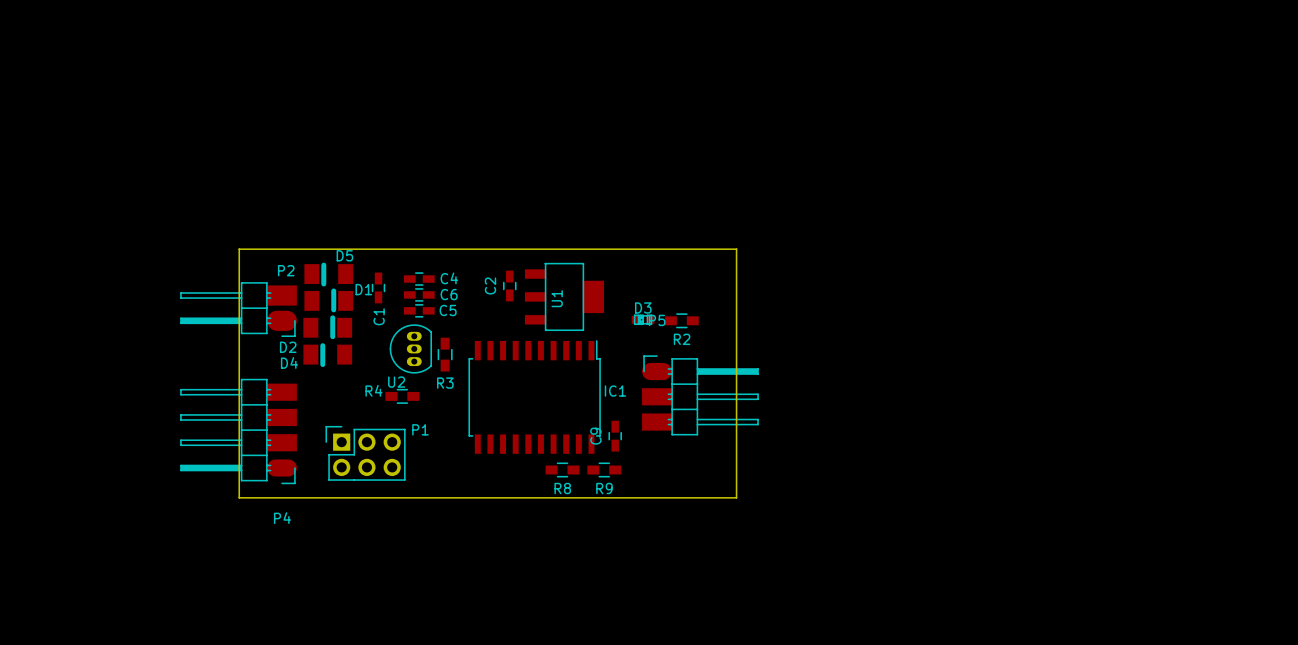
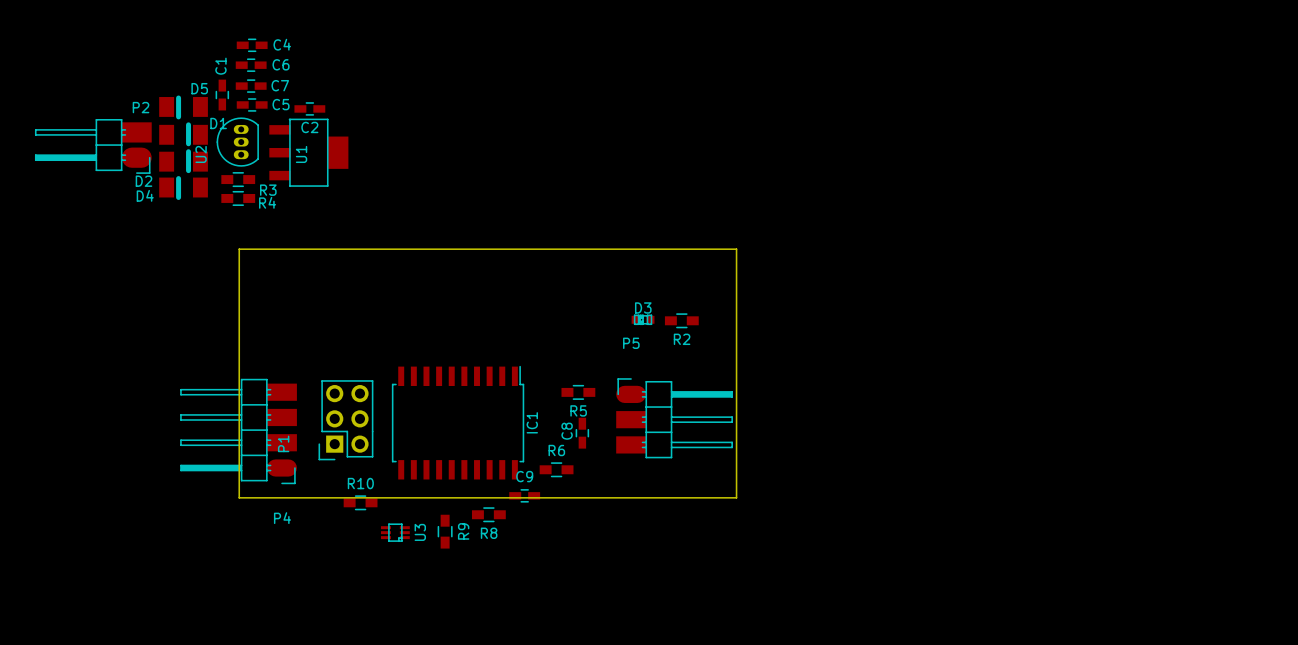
C7: none -> (251, 86)
D5 position: (328, 274) -> (183, 107)
C4 position: (419, 279) -> (252, 45)
C2 name position: C2 (490, 285) -> C2 (309, 127)
C2 rotation: 0° (509, 285) -> 90° clockwise (309, 108)
C2 position: (509, 285) -> (309, 108)
C1 position: (378, 287) -> (222, 95)
C6 position: (419, 294) -> (251, 65)
U1 position: (564, 296) -> (308, 152)
D1 position: (328, 300) -> (183, 134)
P2 position: (238, 309) -> (93, 146)
C5 position: (419, 310) -> (252, 104)
C1 name position: C1 (379, 316) -> C1 (220, 66)
D2 position: (327, 327) -> (183, 161)
U2 position: (410, 348) -> (237, 142)
R3 rotation: 0° (445, 354) -> 90° clockwise (238, 179)
R3 position: (445, 354) -> (238, 179)
D4 position: (327, 355) -> (183, 188)
U2 name rotation: 0° (396, 382) -> 90° counterclockwise (201, 154)
U2 name position: U2 (396, 382) -> U2 (201, 154)
R3 name position: R3 (445, 383) -> R3 (268, 190)
R4 name position: R4 (373, 390) -> R4 (267, 202)
IC1 name rotation: 0° (615, 391) -> 90° counterclockwise (532, 422)
R5: none -> (578, 392)
P5 position: (700, 395) -> (674, 418)
R4 position: (402, 396) -> (238, 198)
IC1 position: (534, 397) -> (458, 422)
P1 name position: P1 (420, 429) -> P1 (283, 443)
C8: none -> (582, 433)
C9 rotation: 0° (615, 436) -> 90° clockwise (524, 495)
C9 position: (615, 436) -> (524, 495)
P1 rotation: 0° (365, 453) -> 90° counterclockwise (345, 420)
R6: none -> (556, 469)
R8 position: (562, 469) -> (488, 514)
R9 rotation: 0° (604, 469) -> 90° clockwise (445, 531)
R9 position: (604, 469) -> (445, 531)
R9 name position: R9 (604, 488) -> R9 (463, 531)
R10: none -> (360, 502)
U3: none -> (395, 532)

